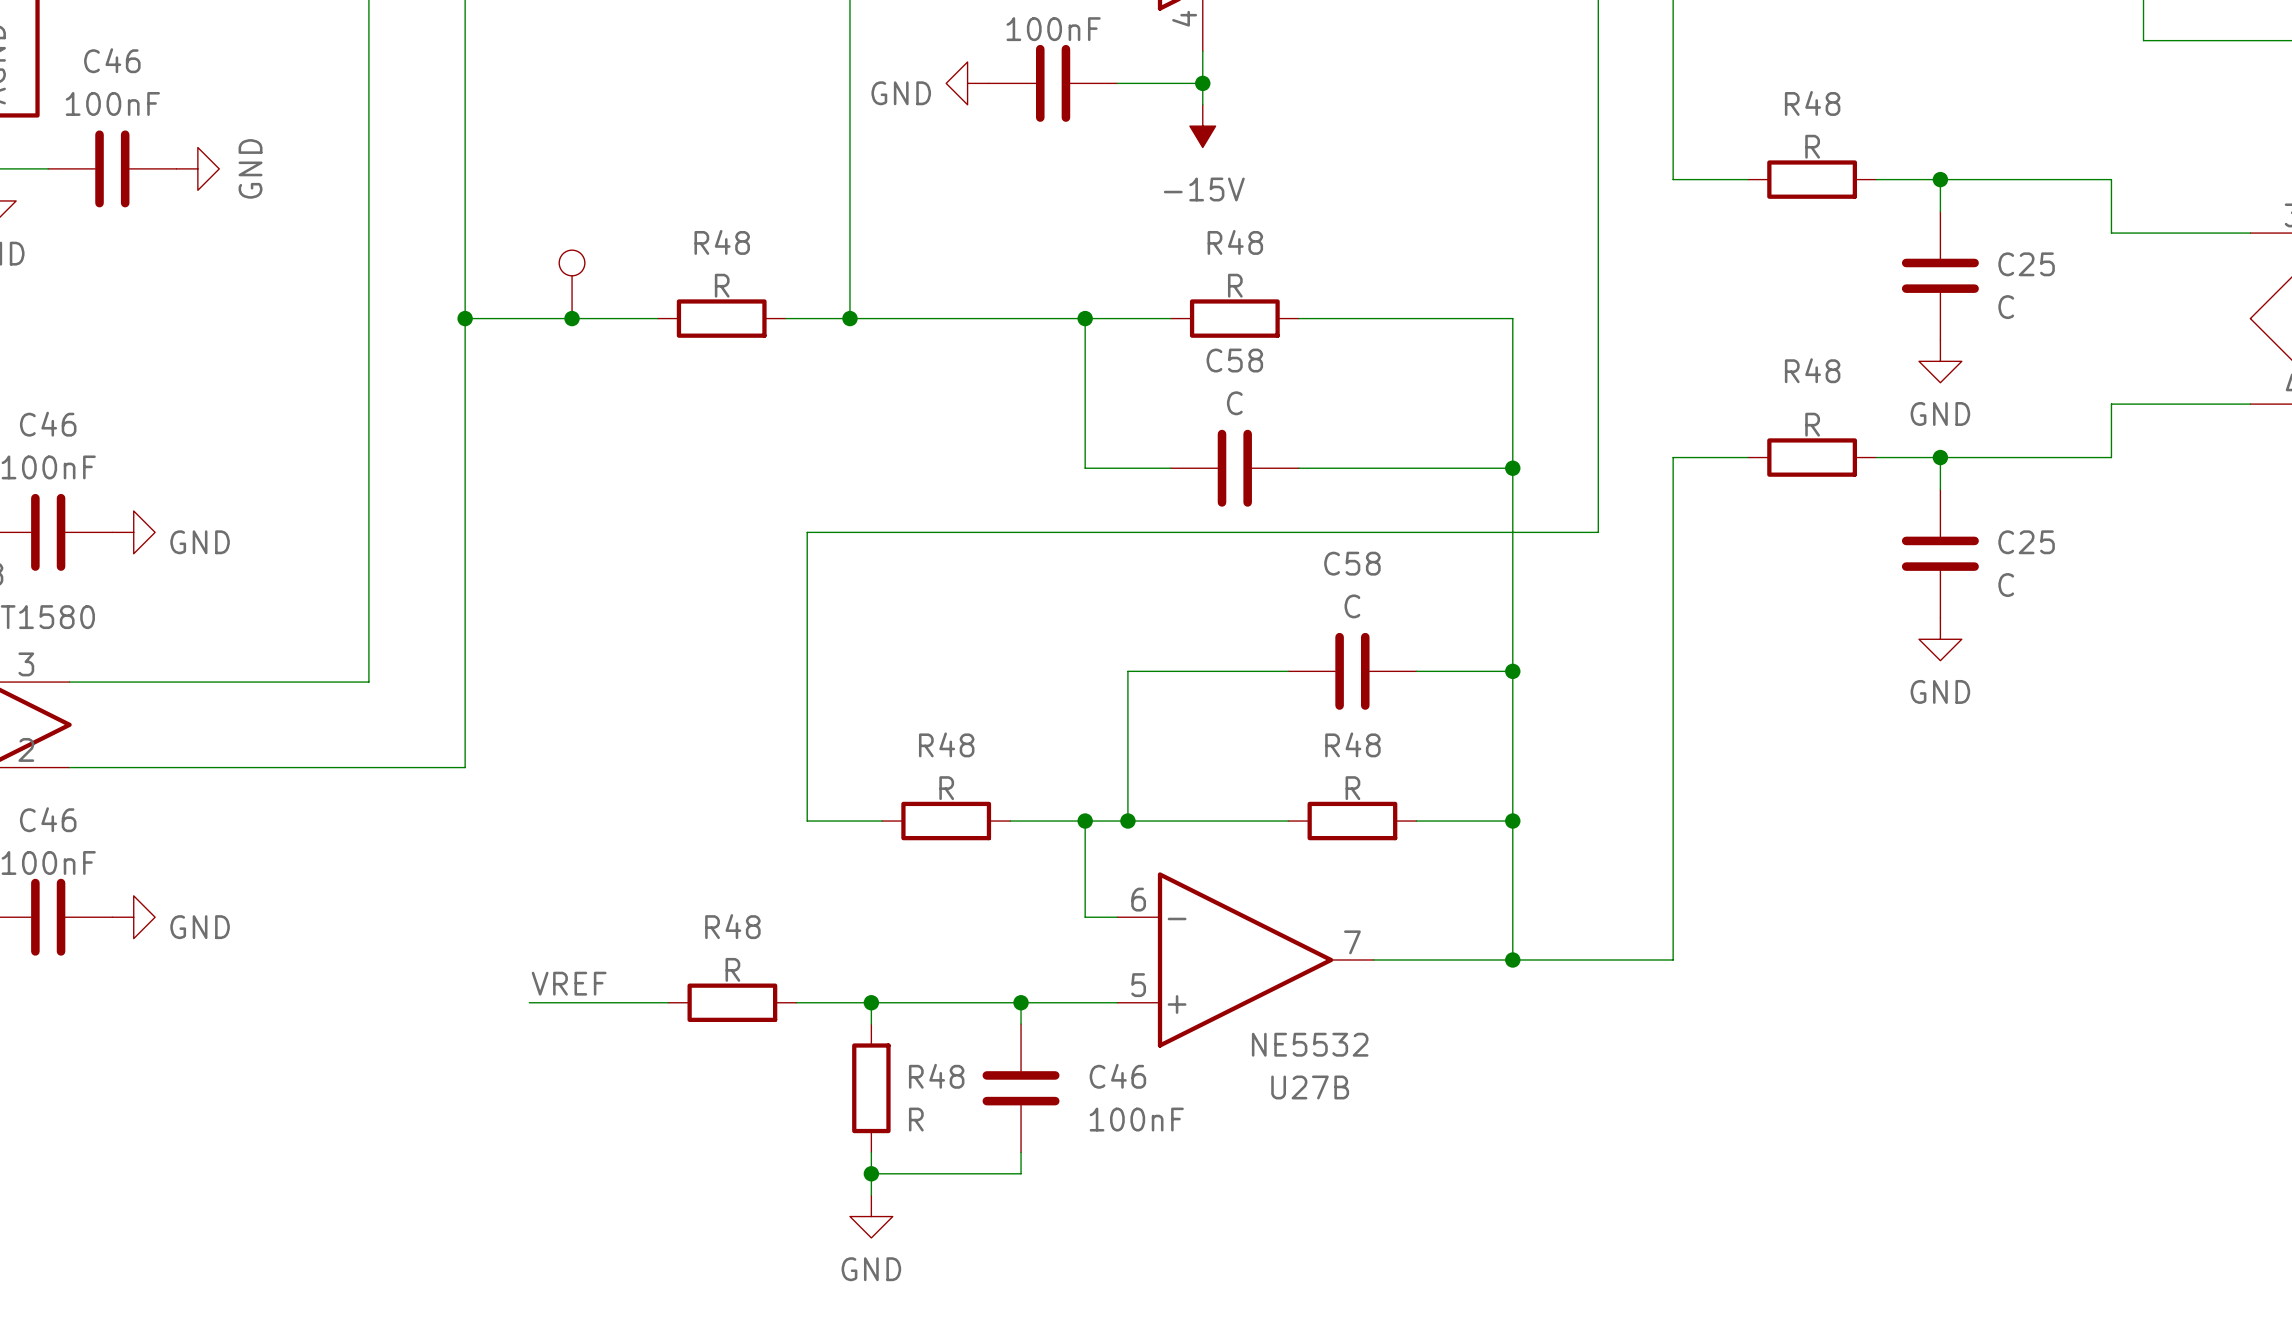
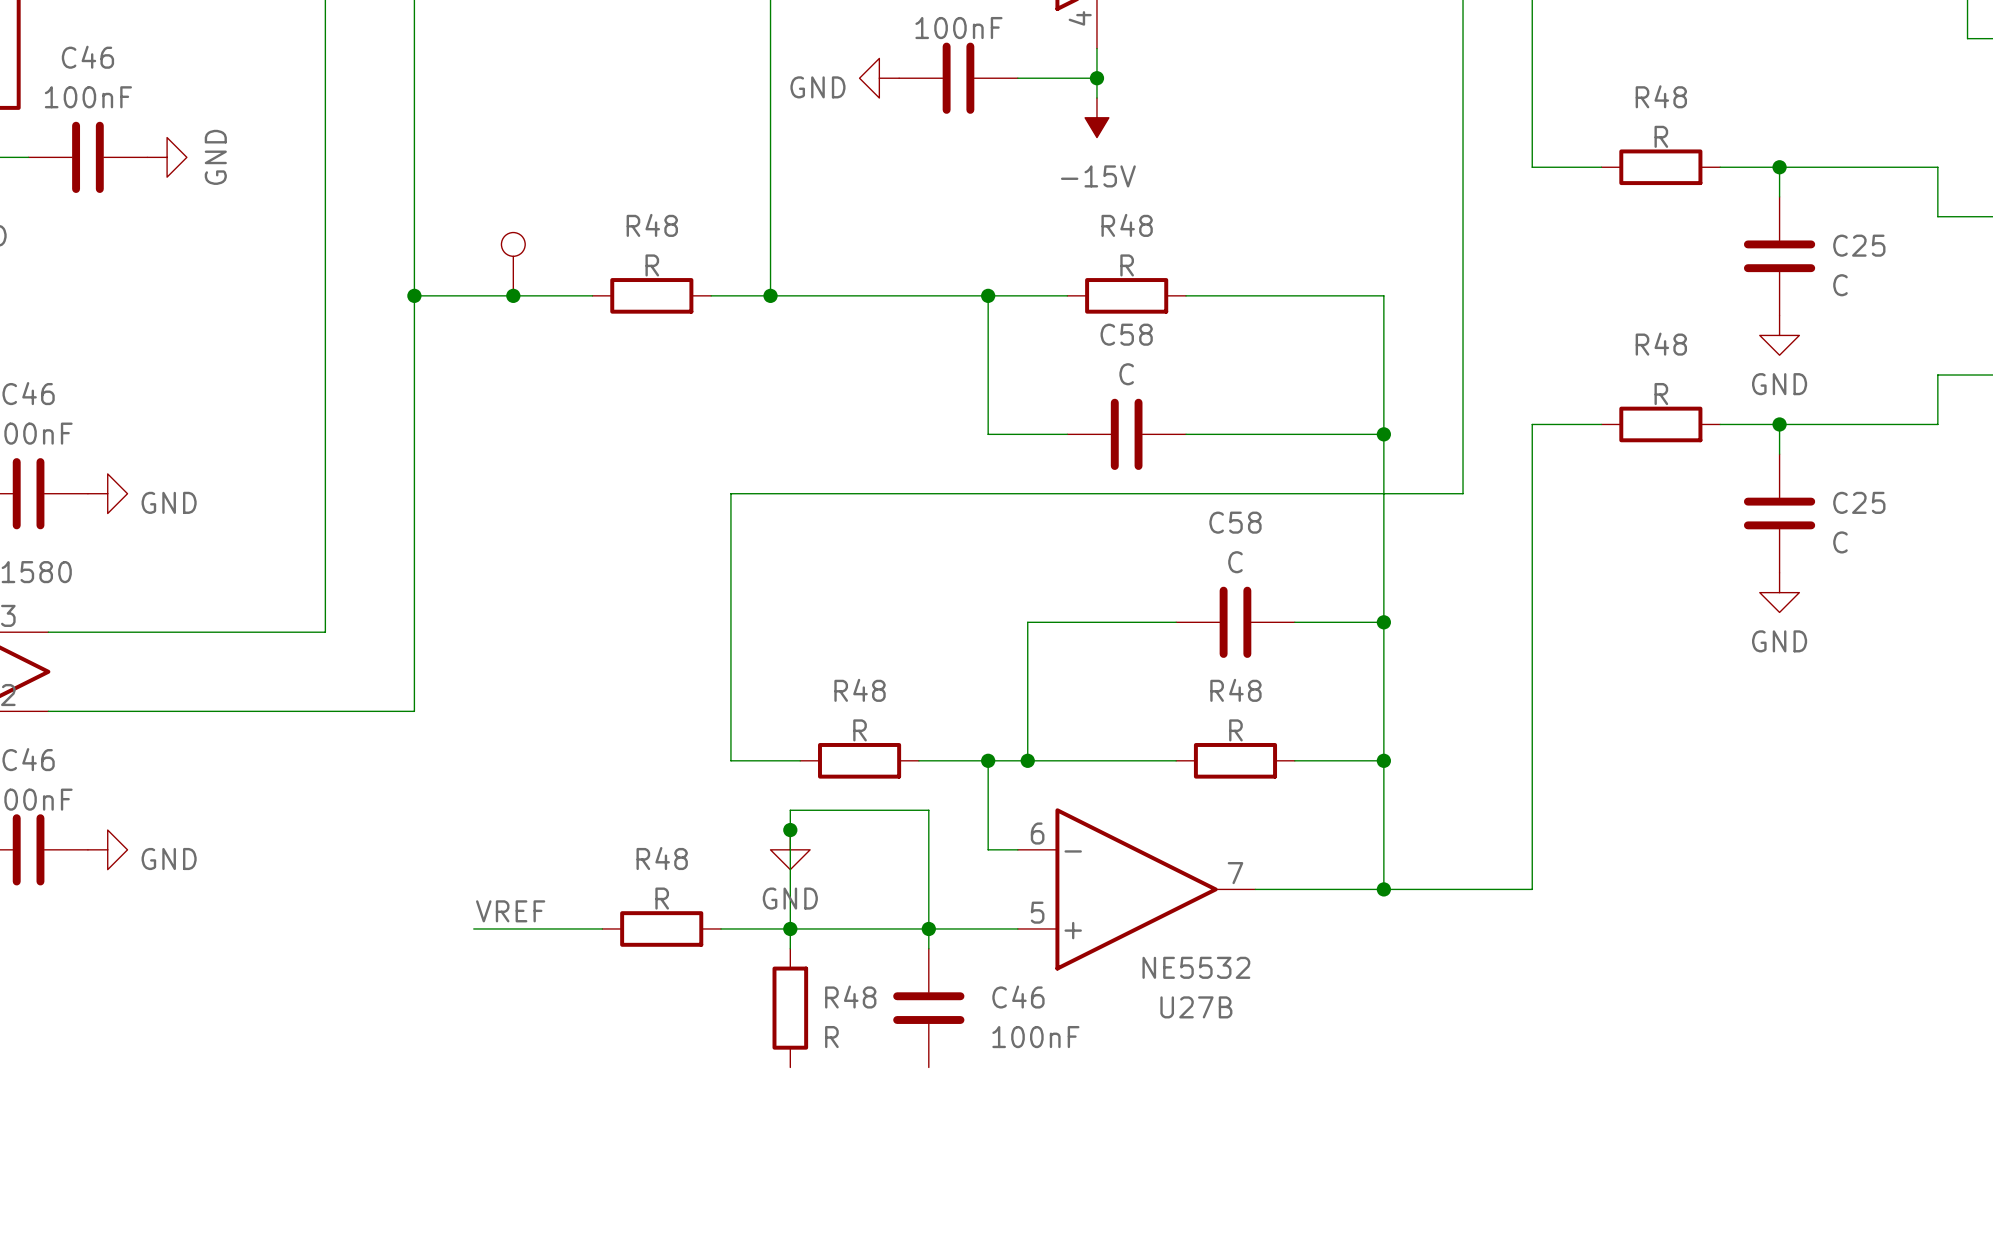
junction: none -> (790, 830)
wire: none -> (790, 928) (790, 810) (928, 810) (928, 928)
wire: (871, 1152) (871, 1195) -> none
wire: (1021, 1152) (1021, 1173) (871, 1173) -> none
junction: (871, 1173) -> none
power symbol position: GND (871, 1216) -> GND (790, 849)

